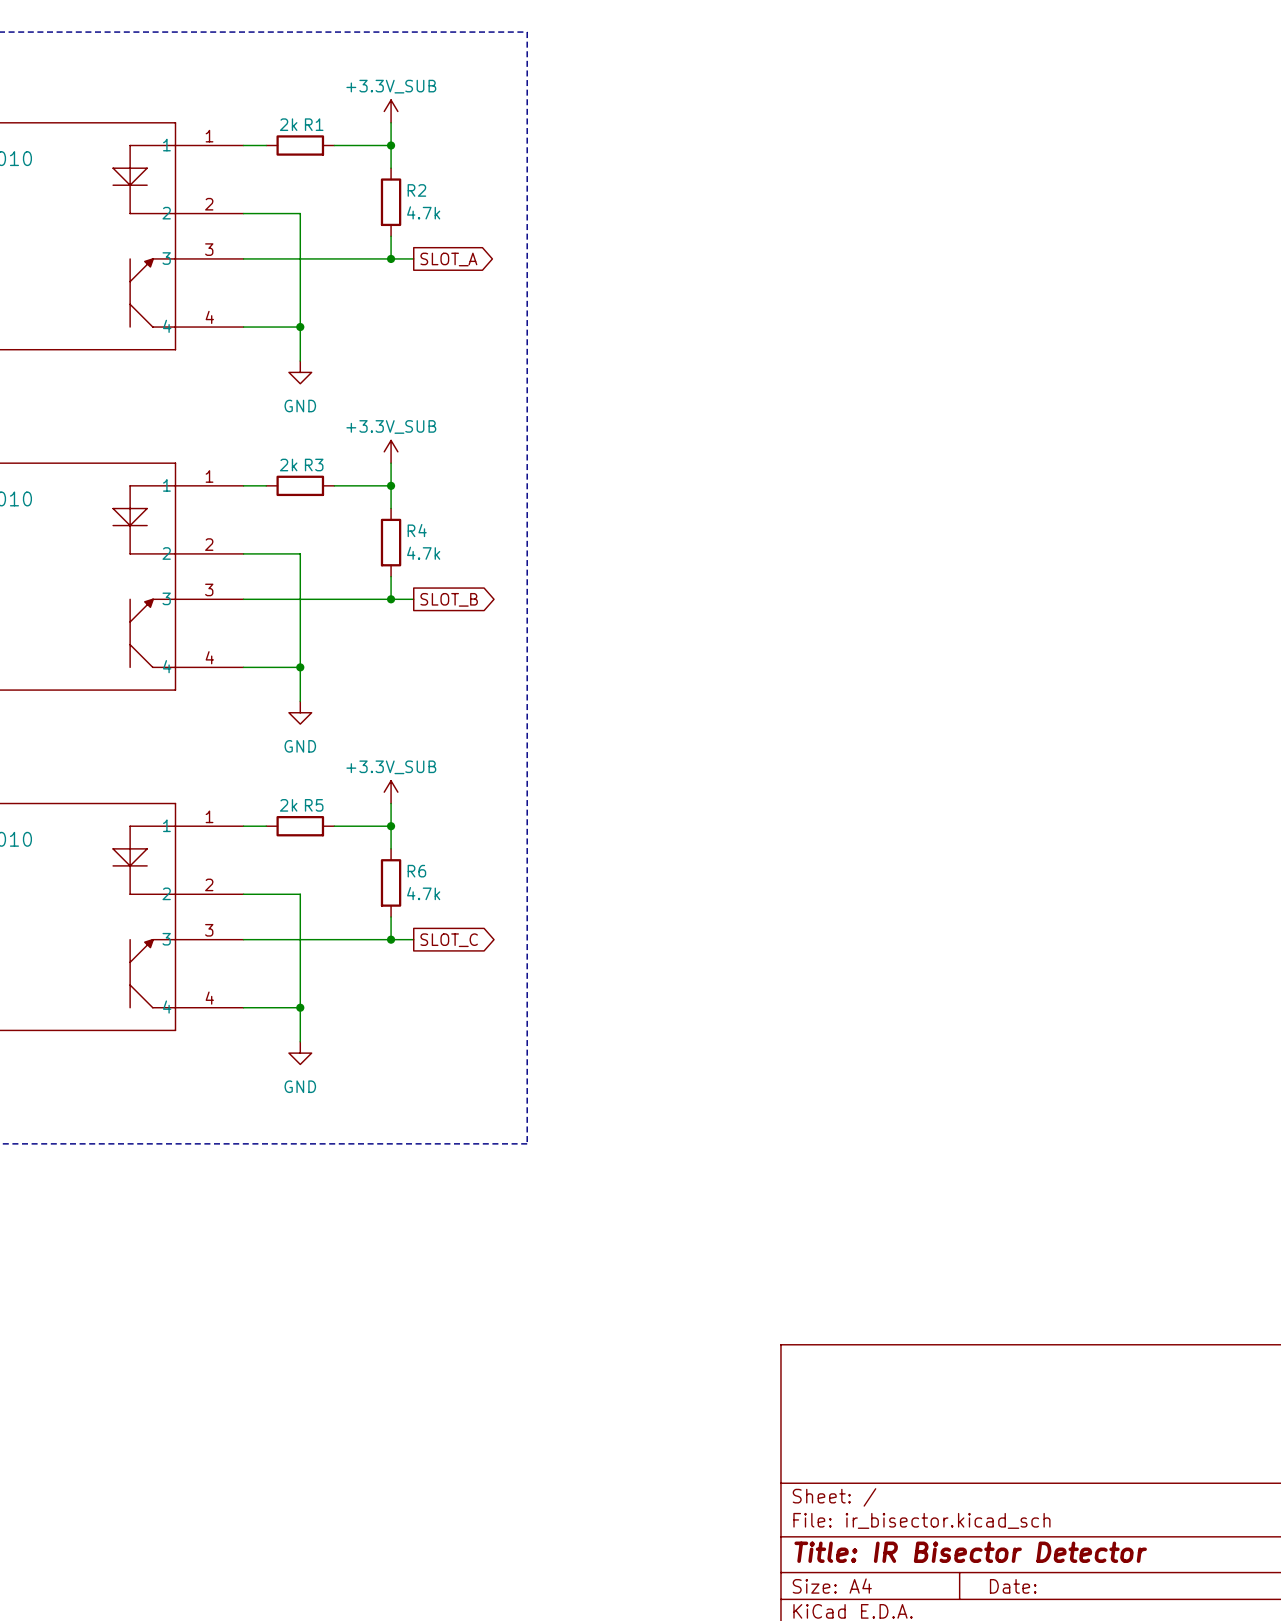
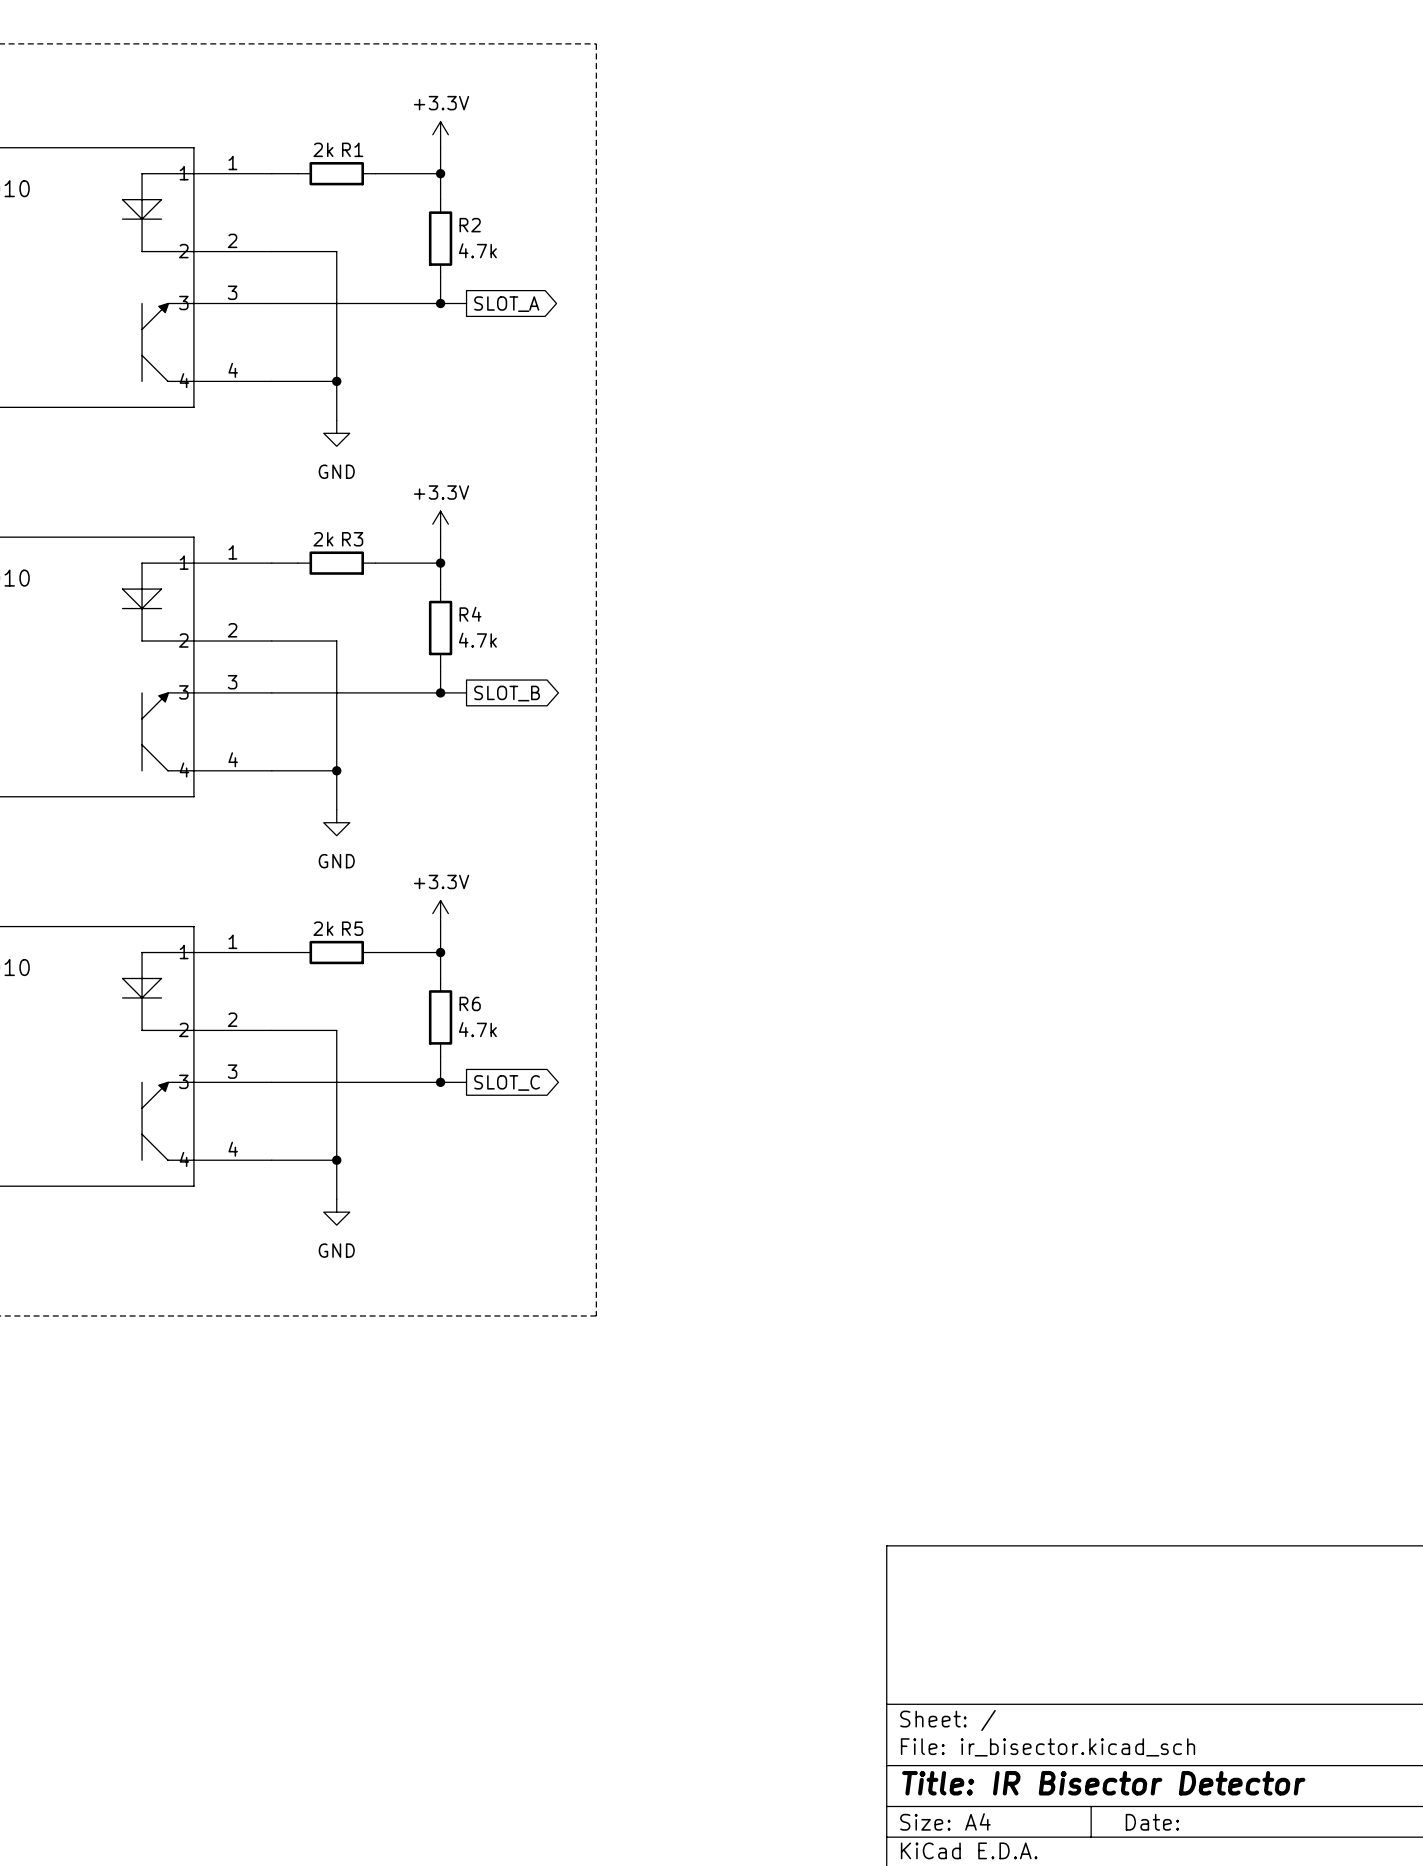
power symbol: +3.3V_SUB (391, 111) -> +3.3V (440, 134)
power symbol: +3.3V_SUB (391, 451) -> +3.3V (440, 524)
power symbol: +3.3V_SUB (391, 792) -> +3.3V (440, 913)

